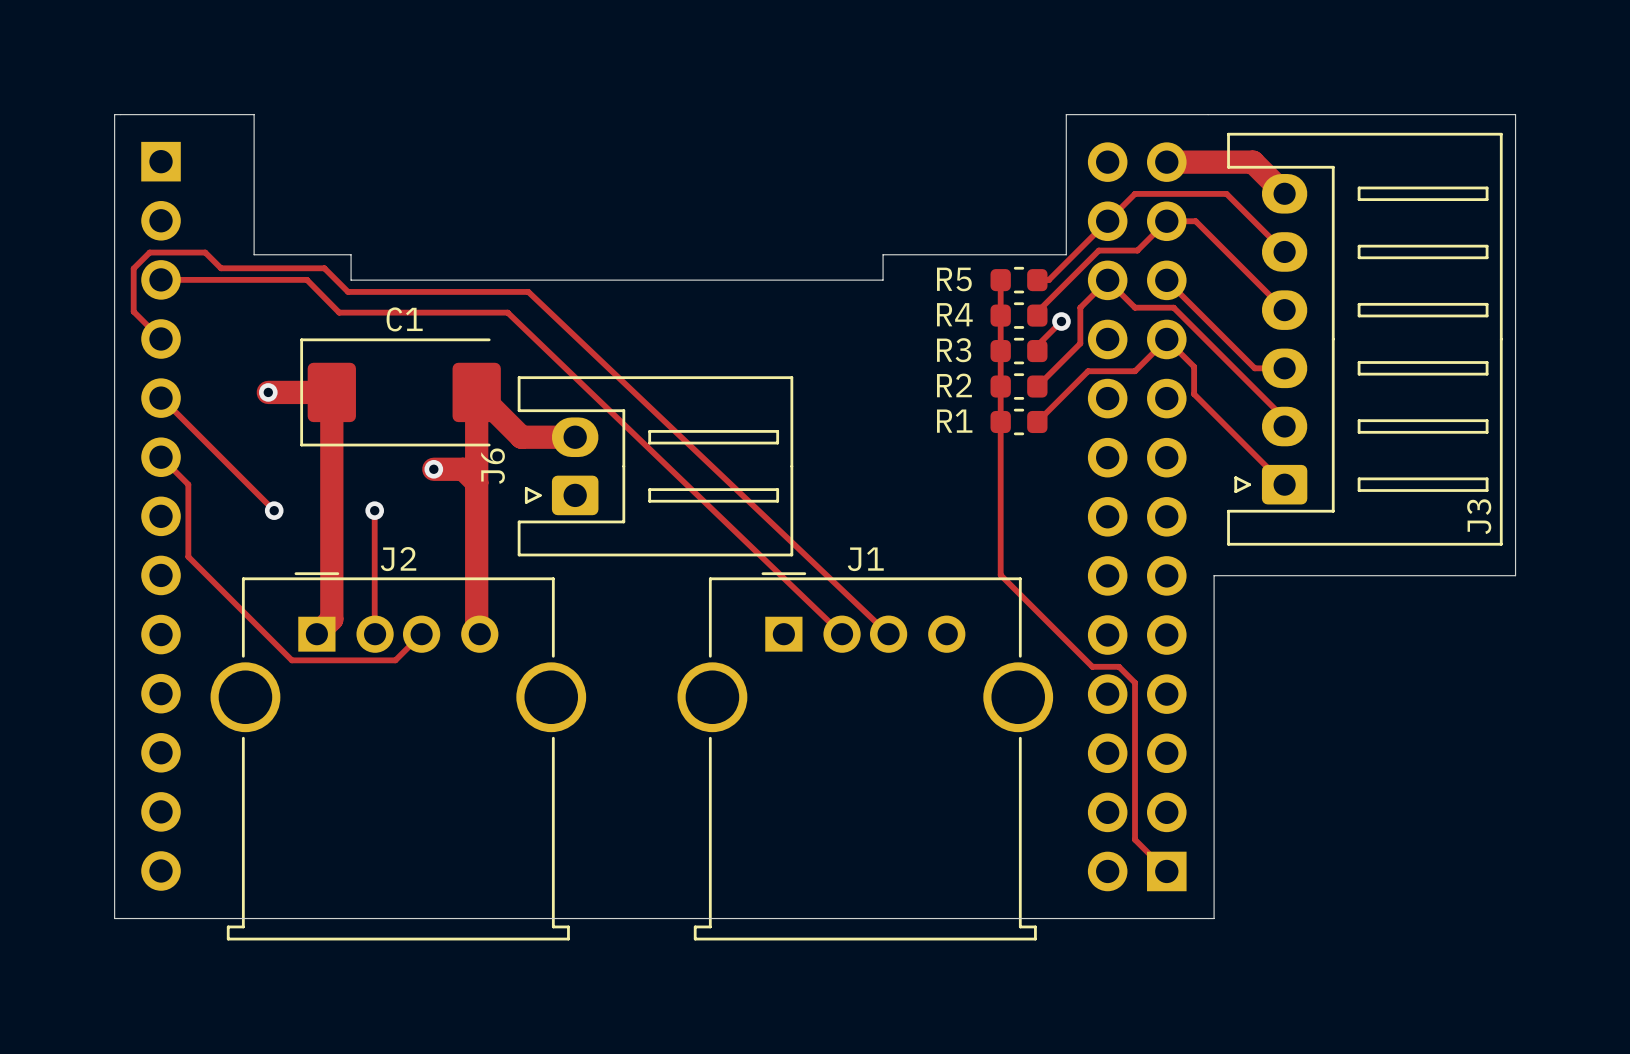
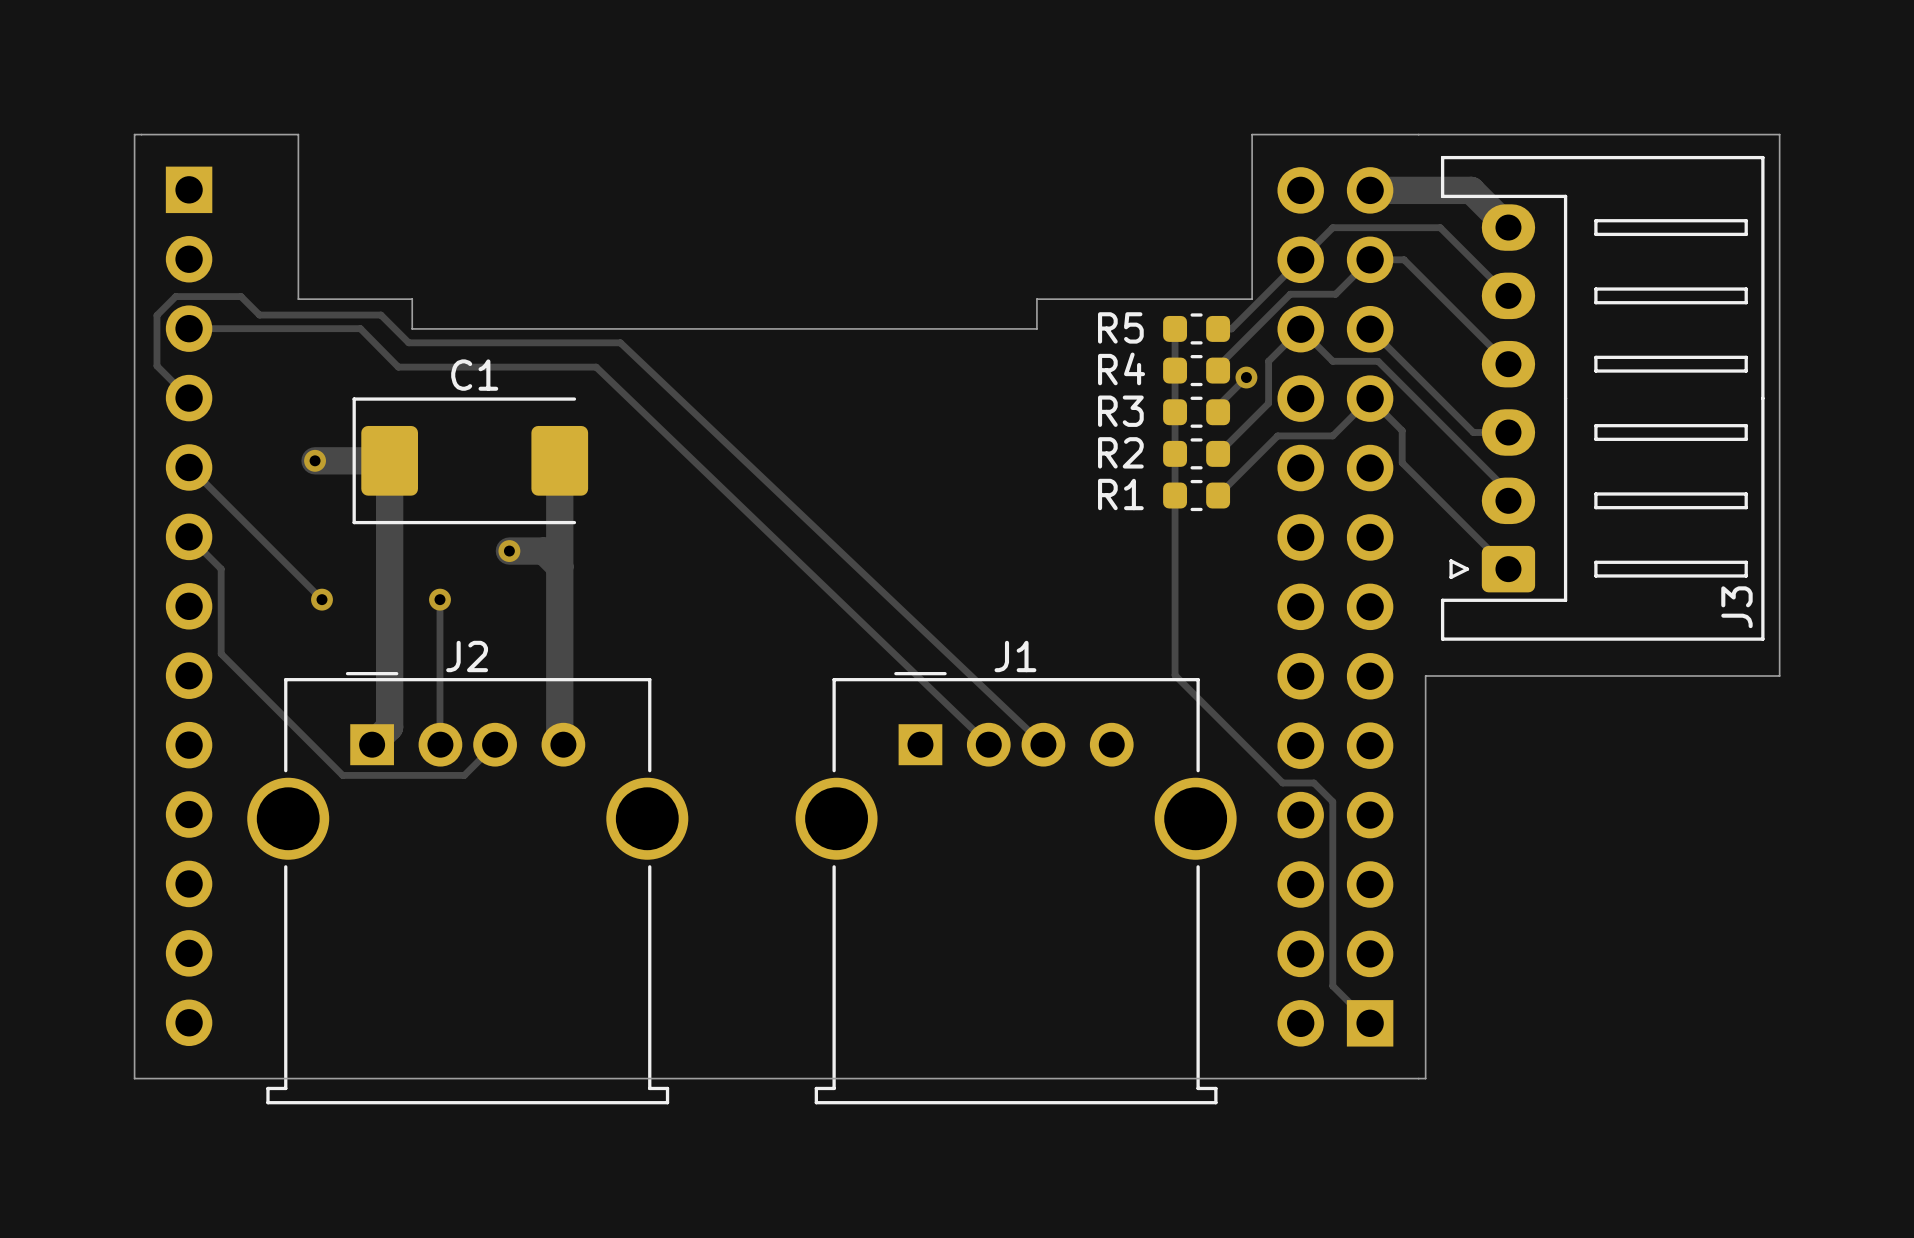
track: (476, 392) (521, 437) (575, 437) -> none
J6: (655, 466) -> none

